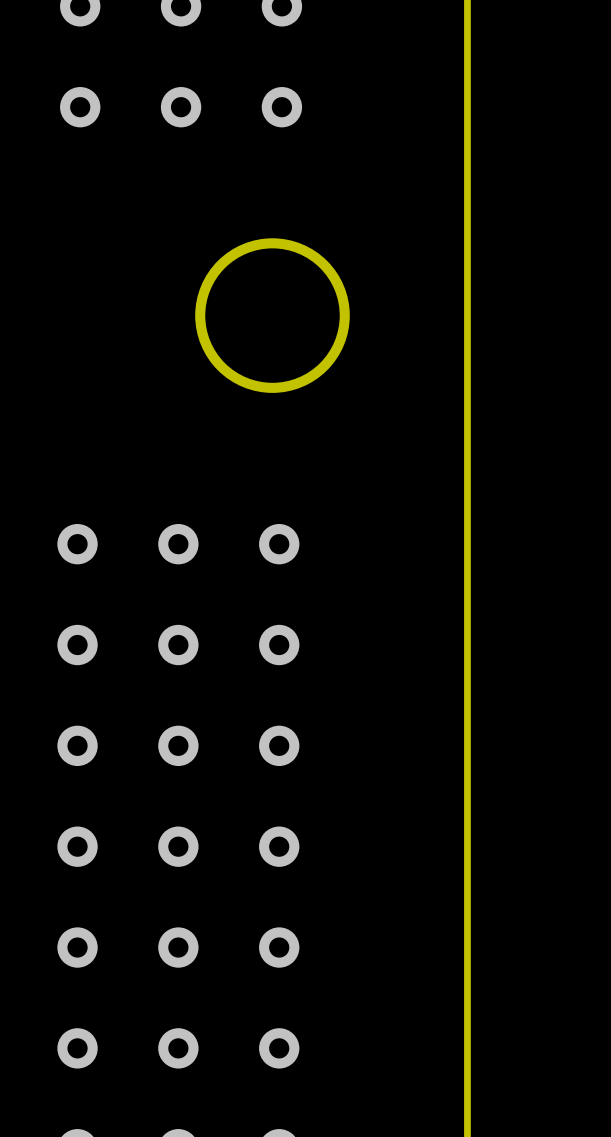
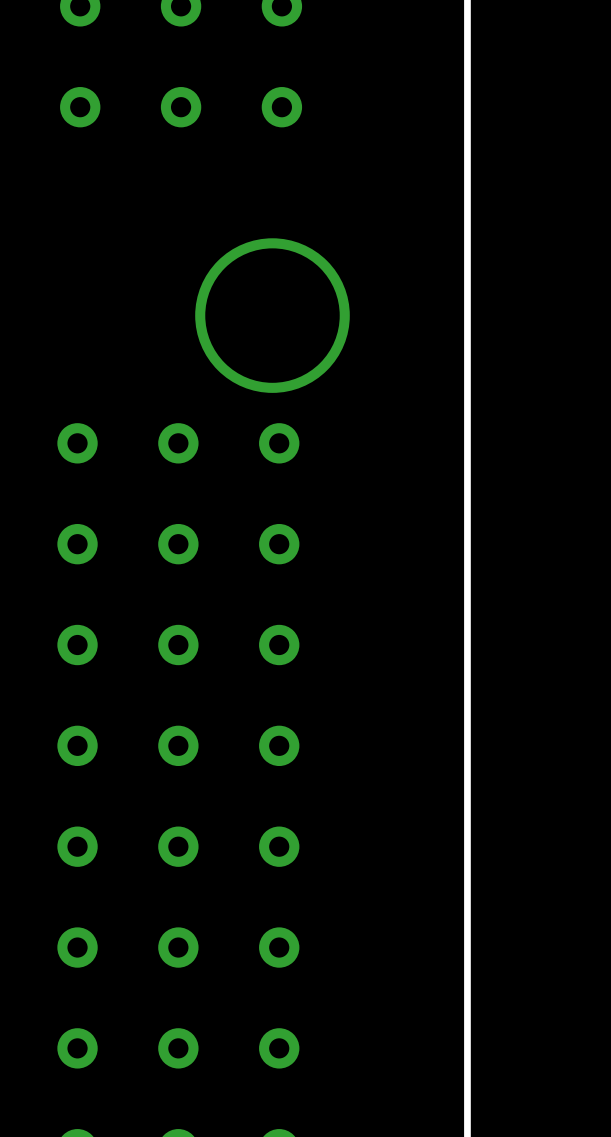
via: none -> (77, 443)
via: none -> (178, 443)
via: none -> (279, 443)

